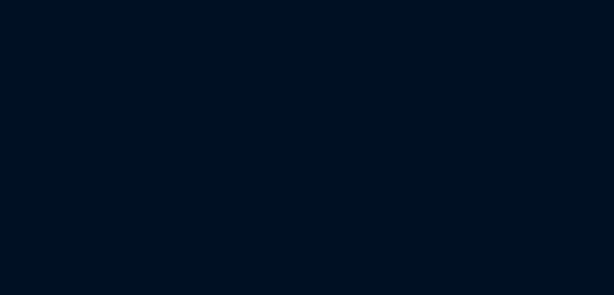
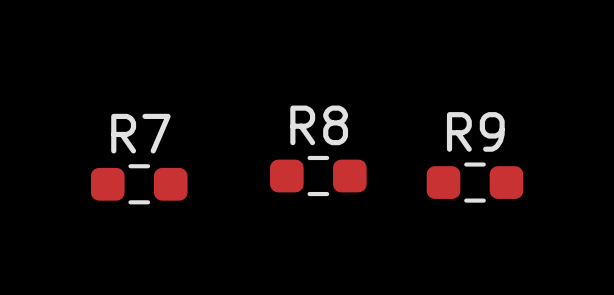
R8: none -> (318, 176)
R9: none -> (474, 182)
R7: none -> (139, 184)

